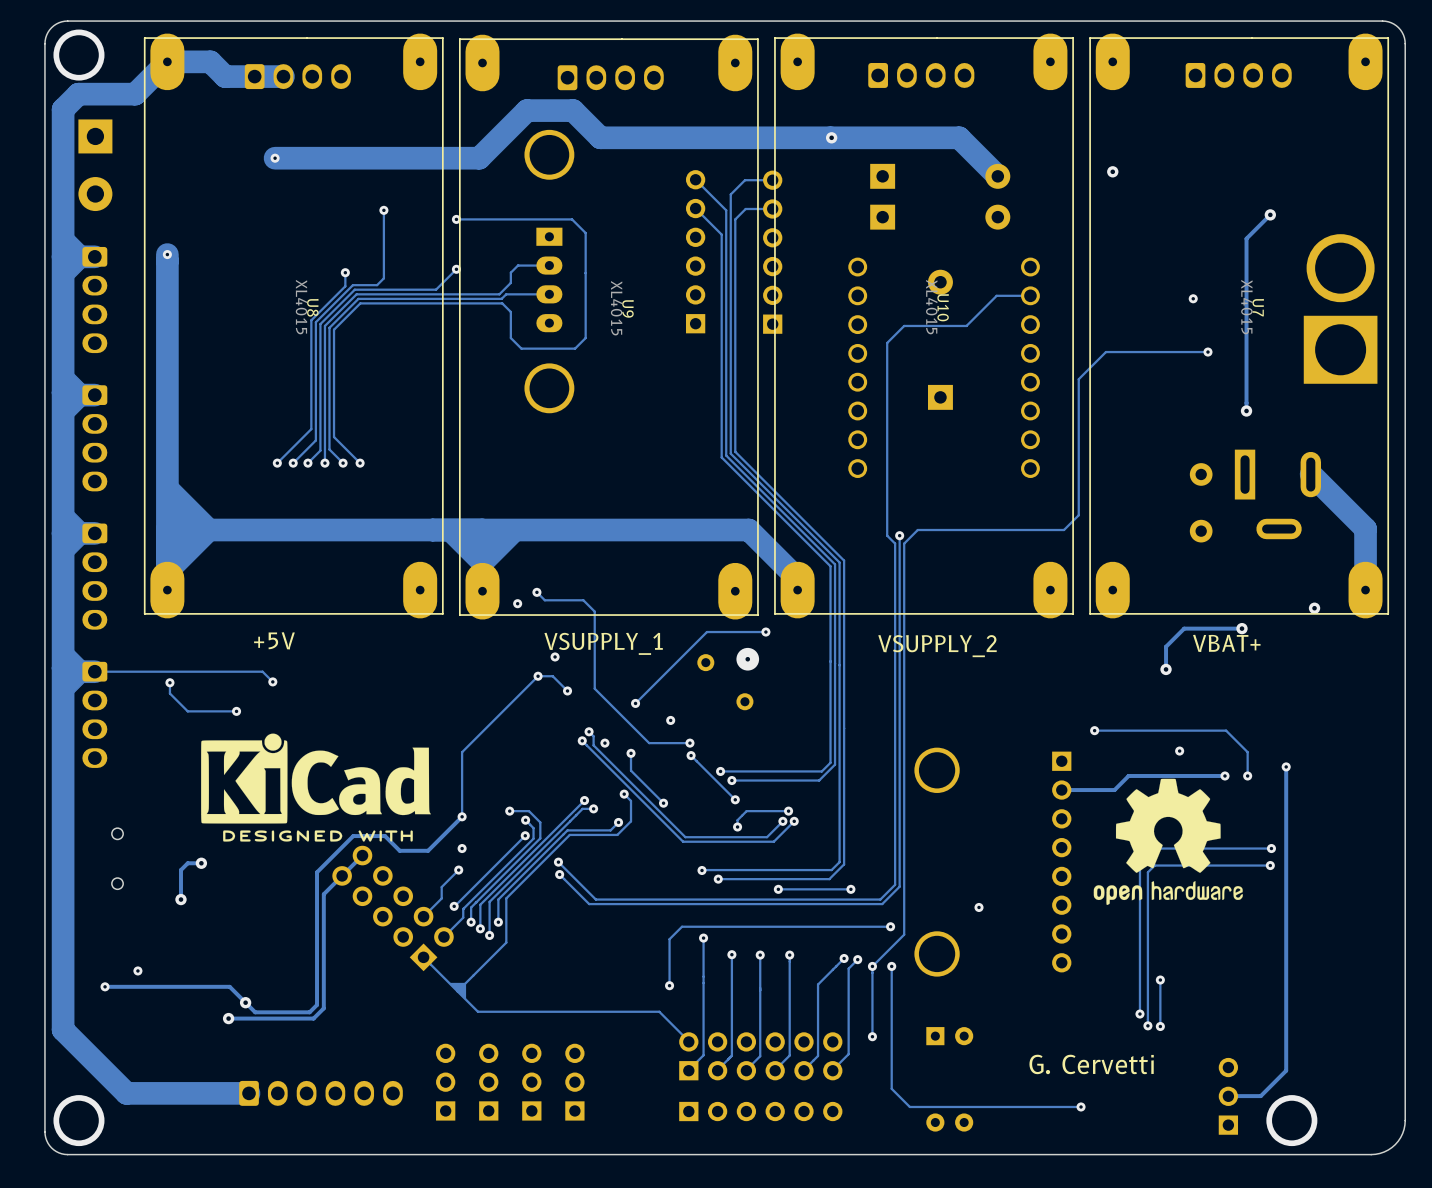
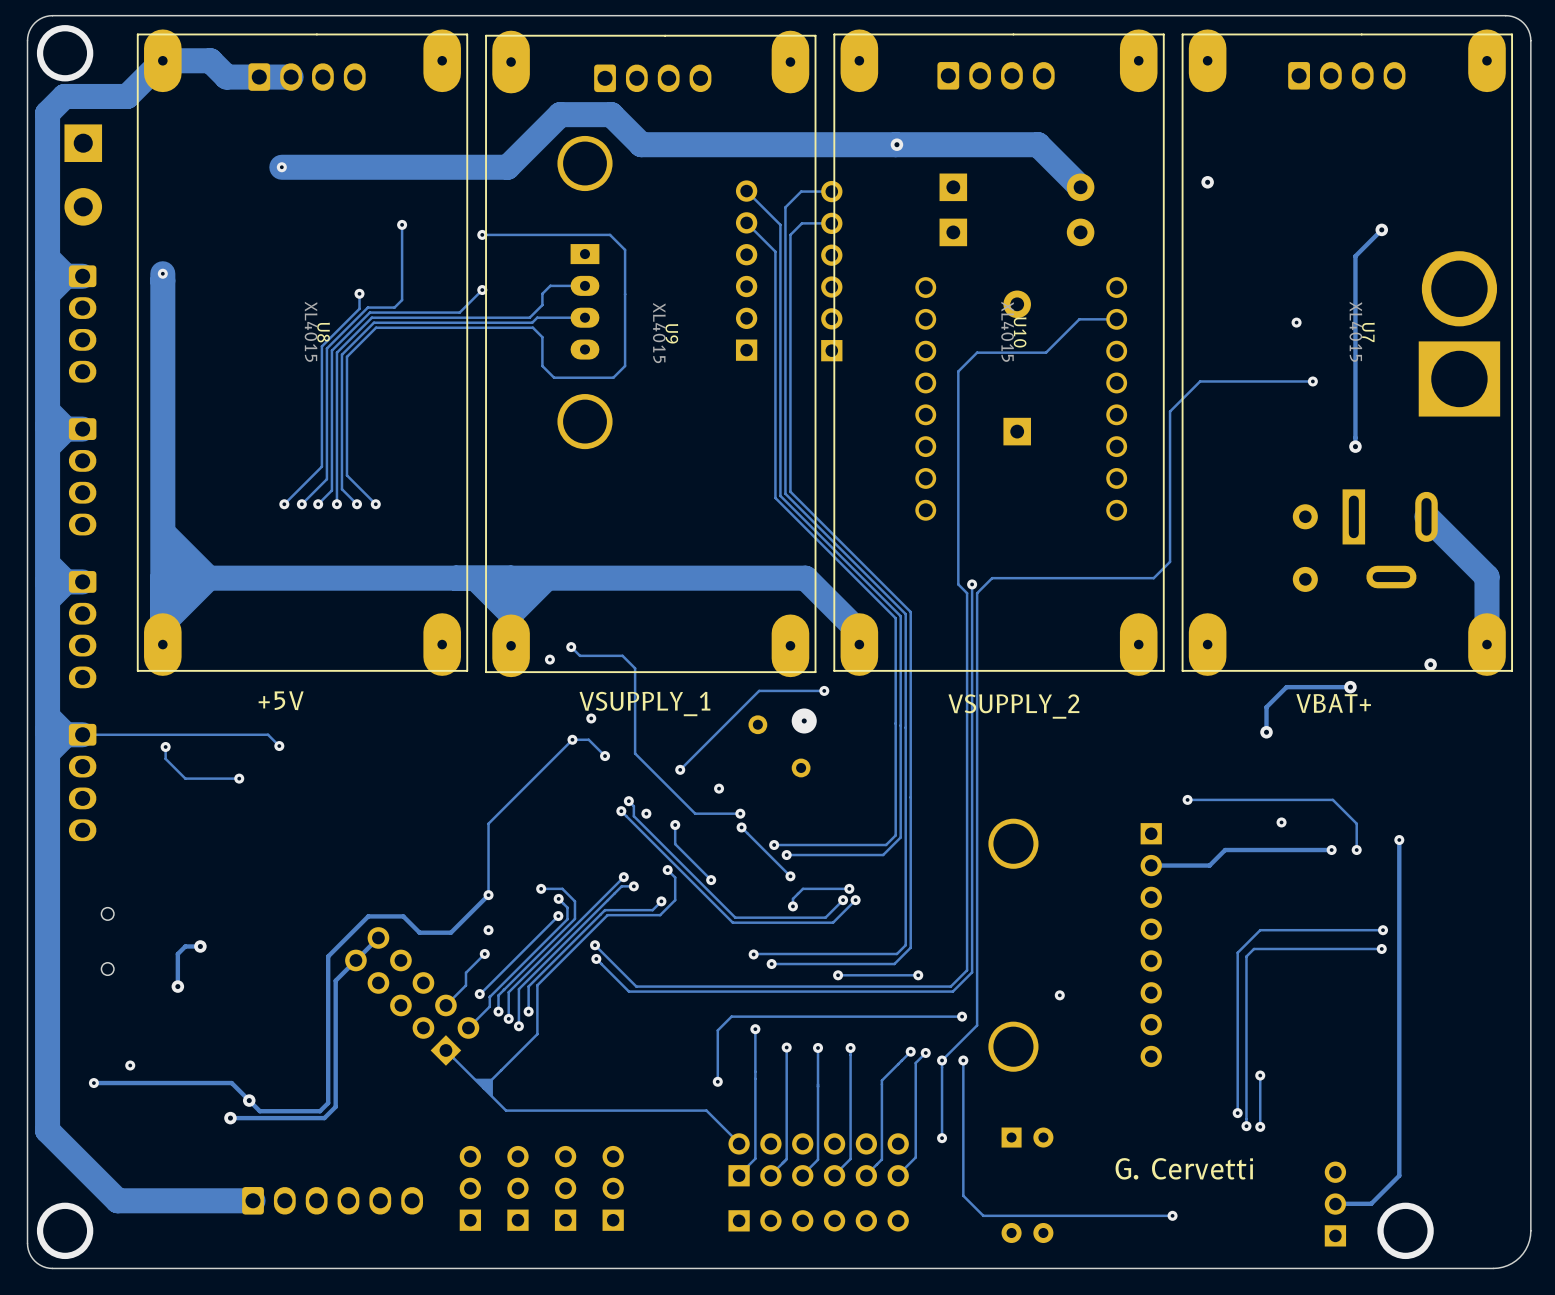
drawing: [201, 733, 431, 842] -> none
drawing: [1093, 778, 1243, 905] -> none

